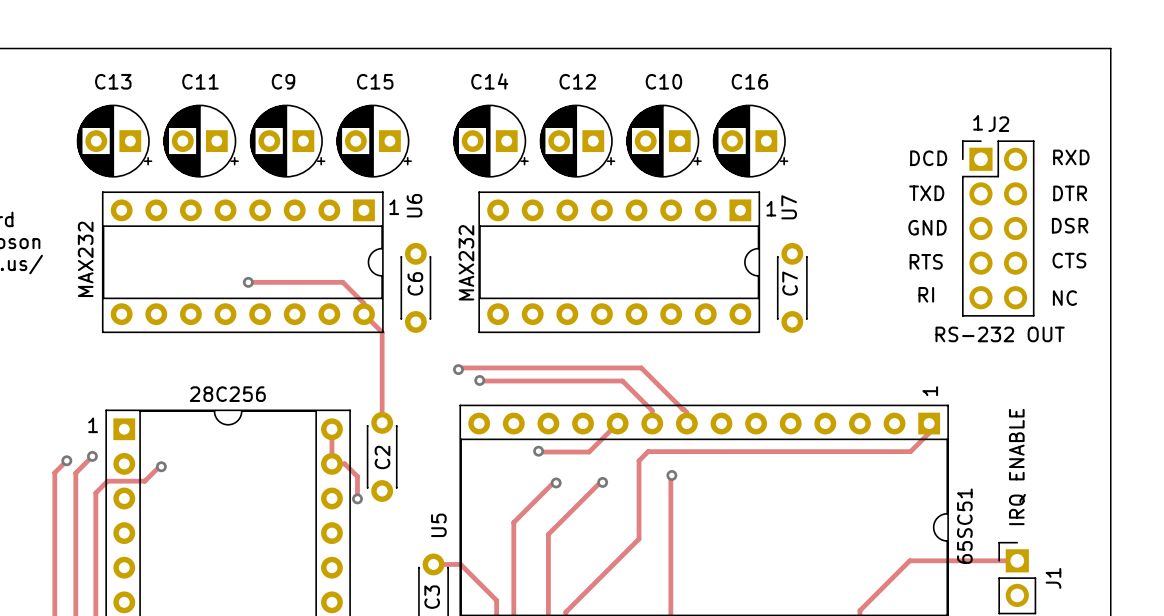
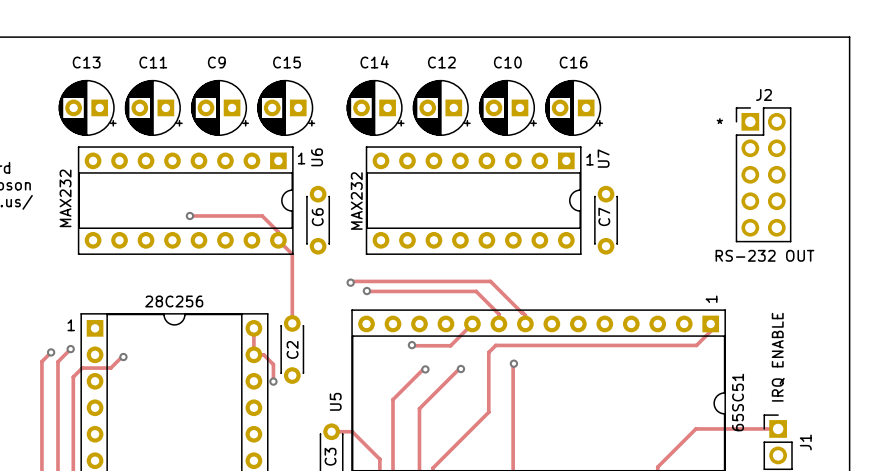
text: 1 (978, 122) -> none
text: RXD (1071, 157) -> none
text: DCD (928, 158) -> * (719, 121)
text: TXD (926, 193) -> none
text: DTR (1070, 193) -> none
text: DSR (1070, 225) -> none
text: GND (927, 227) -> none
text: CTS (1069, 260) -> none
text: RTS (926, 261) -> none
text: RI (926, 294) -> none
text: NC (1064, 298) -> none

